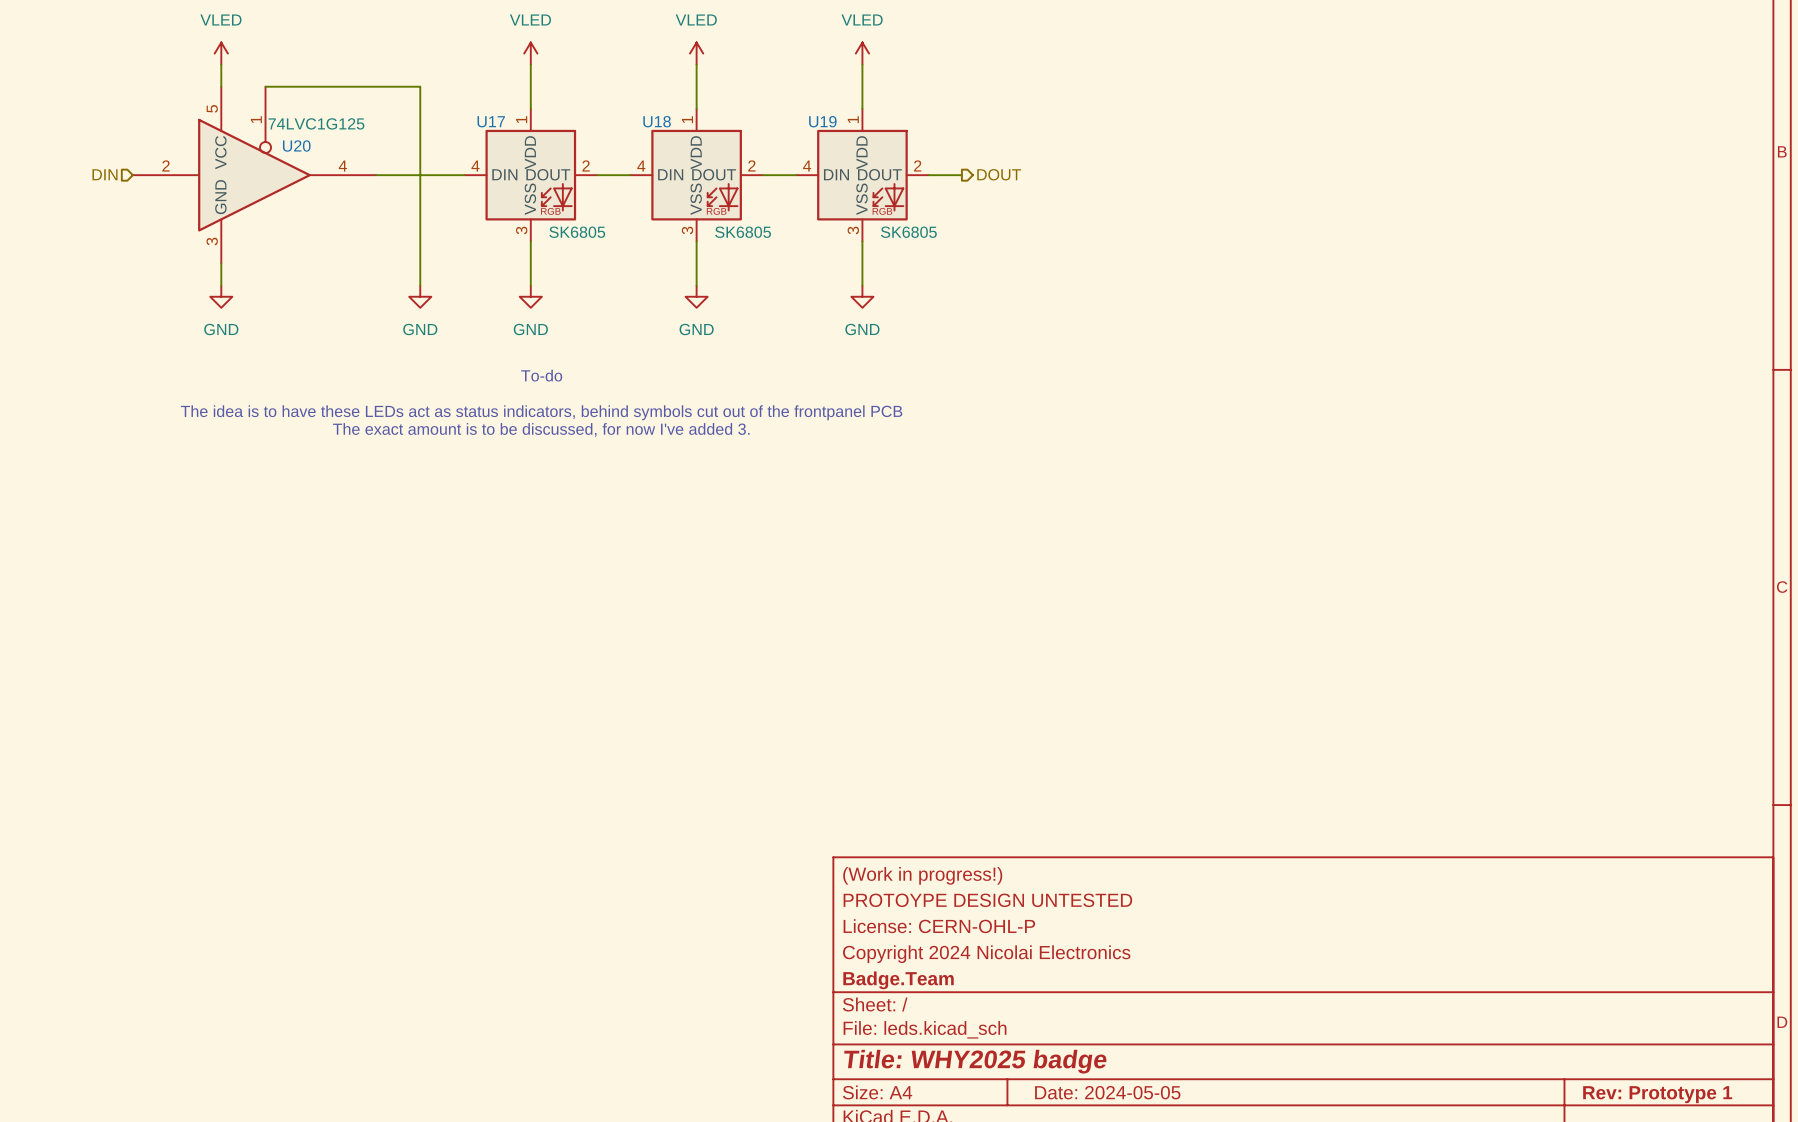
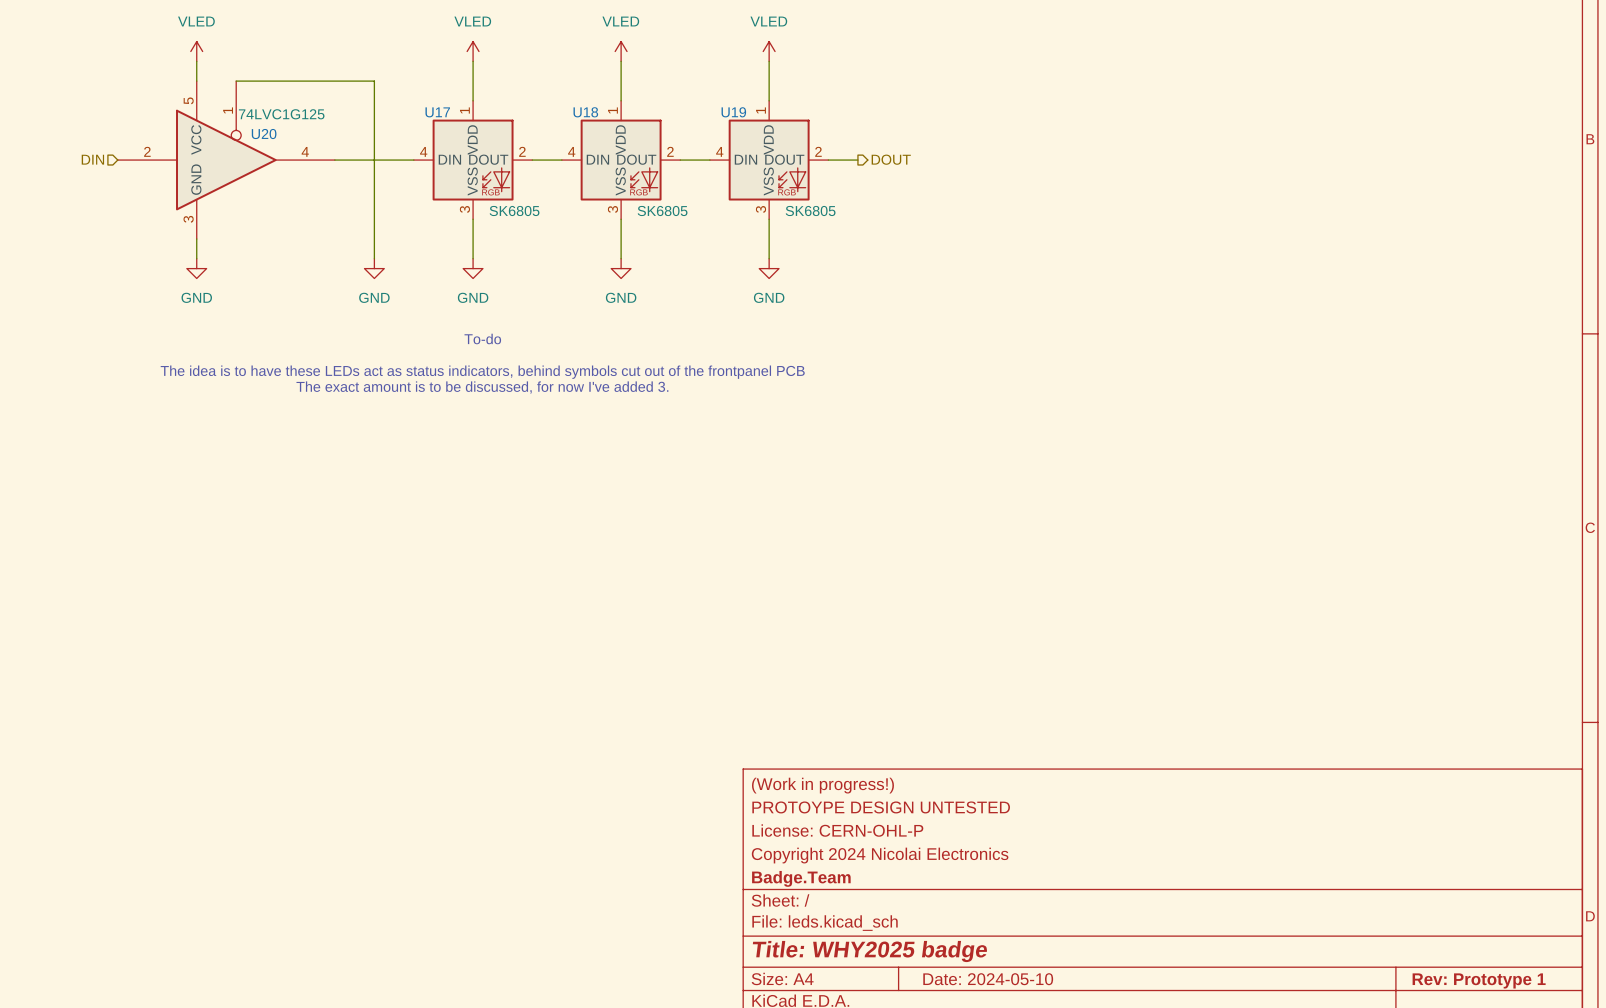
title block: Date: 2024-05-05 (1107, 1092) -> Date: 2024-05-10 (988, 979)

